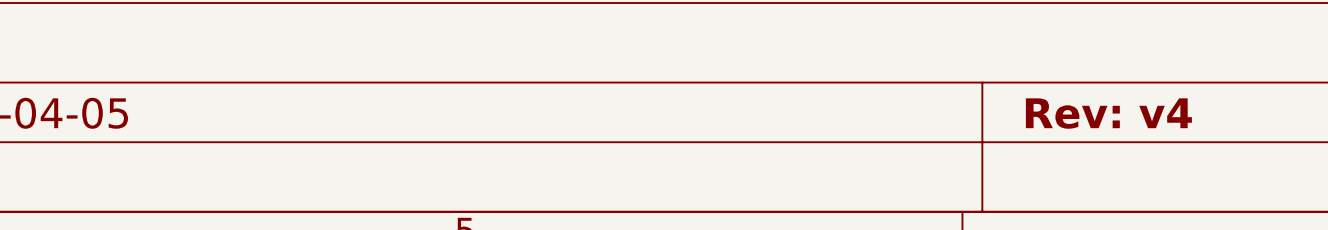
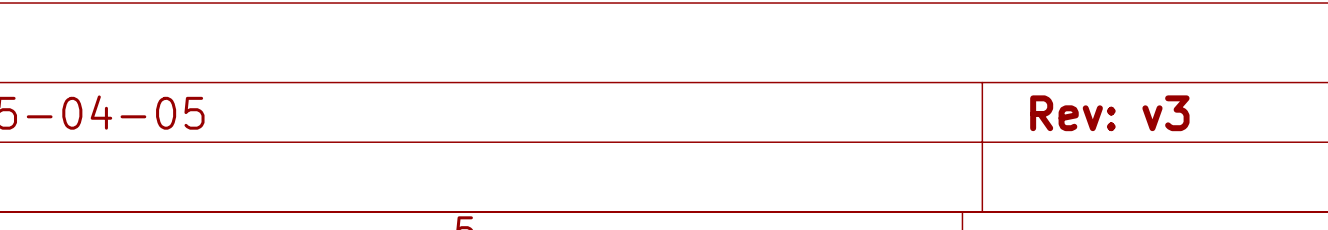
title block: Rev: v4 (1108, 113) -> Rev: v3 (1109, 113)

